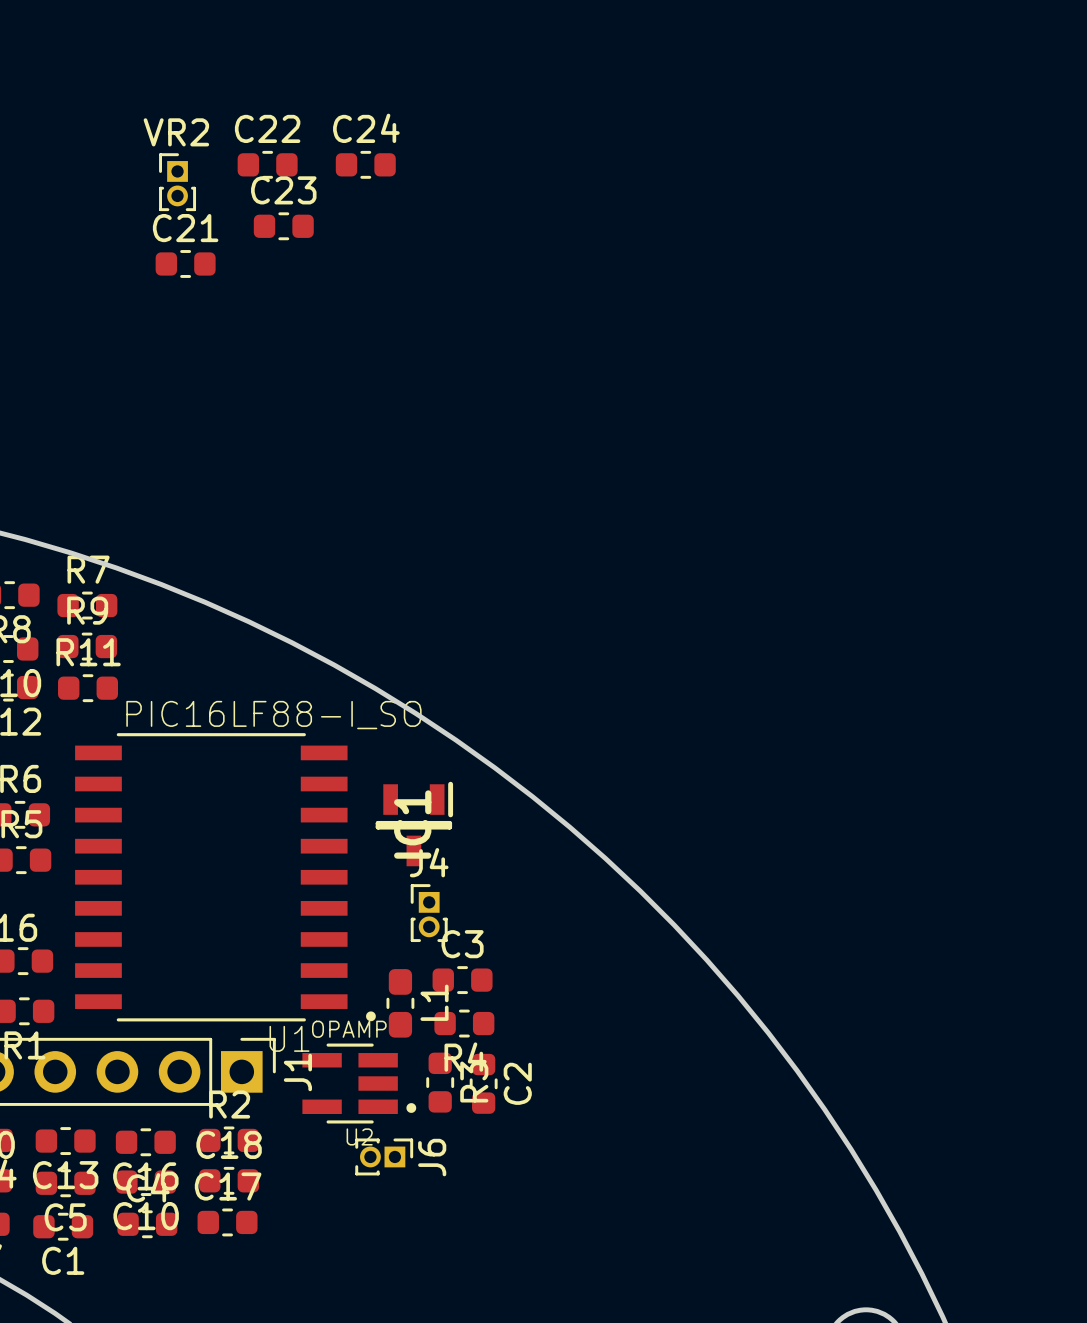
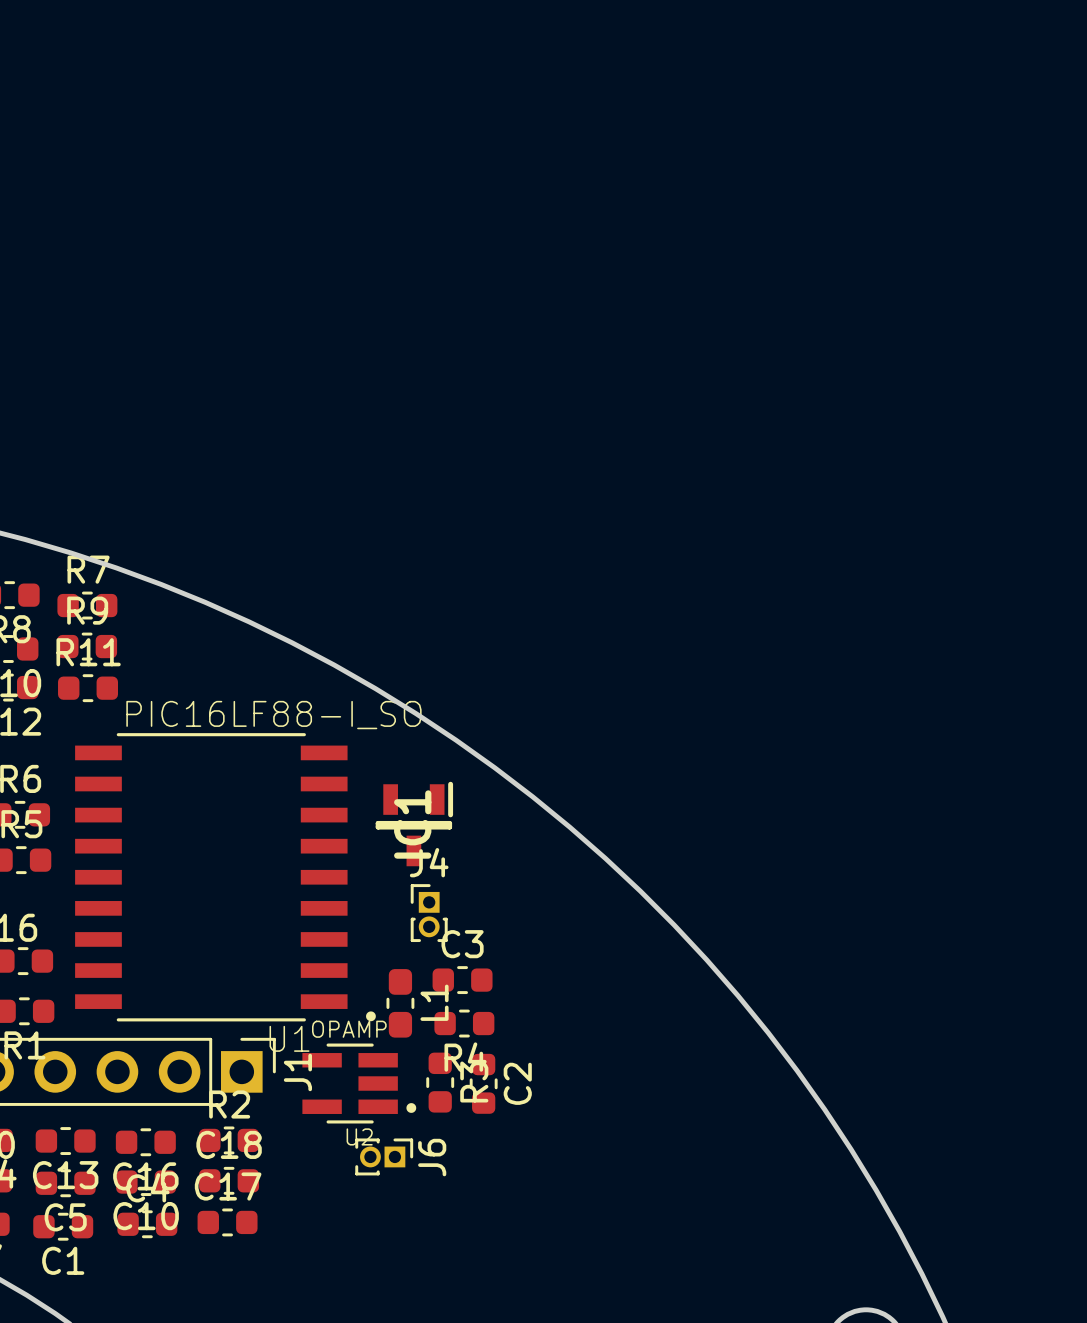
C22: (267, 164) -> none
C24: (365, 164) -> none
VR2: (177, 182) -> none
C23: (283, 226) -> none
C21: (185, 263) -> none

